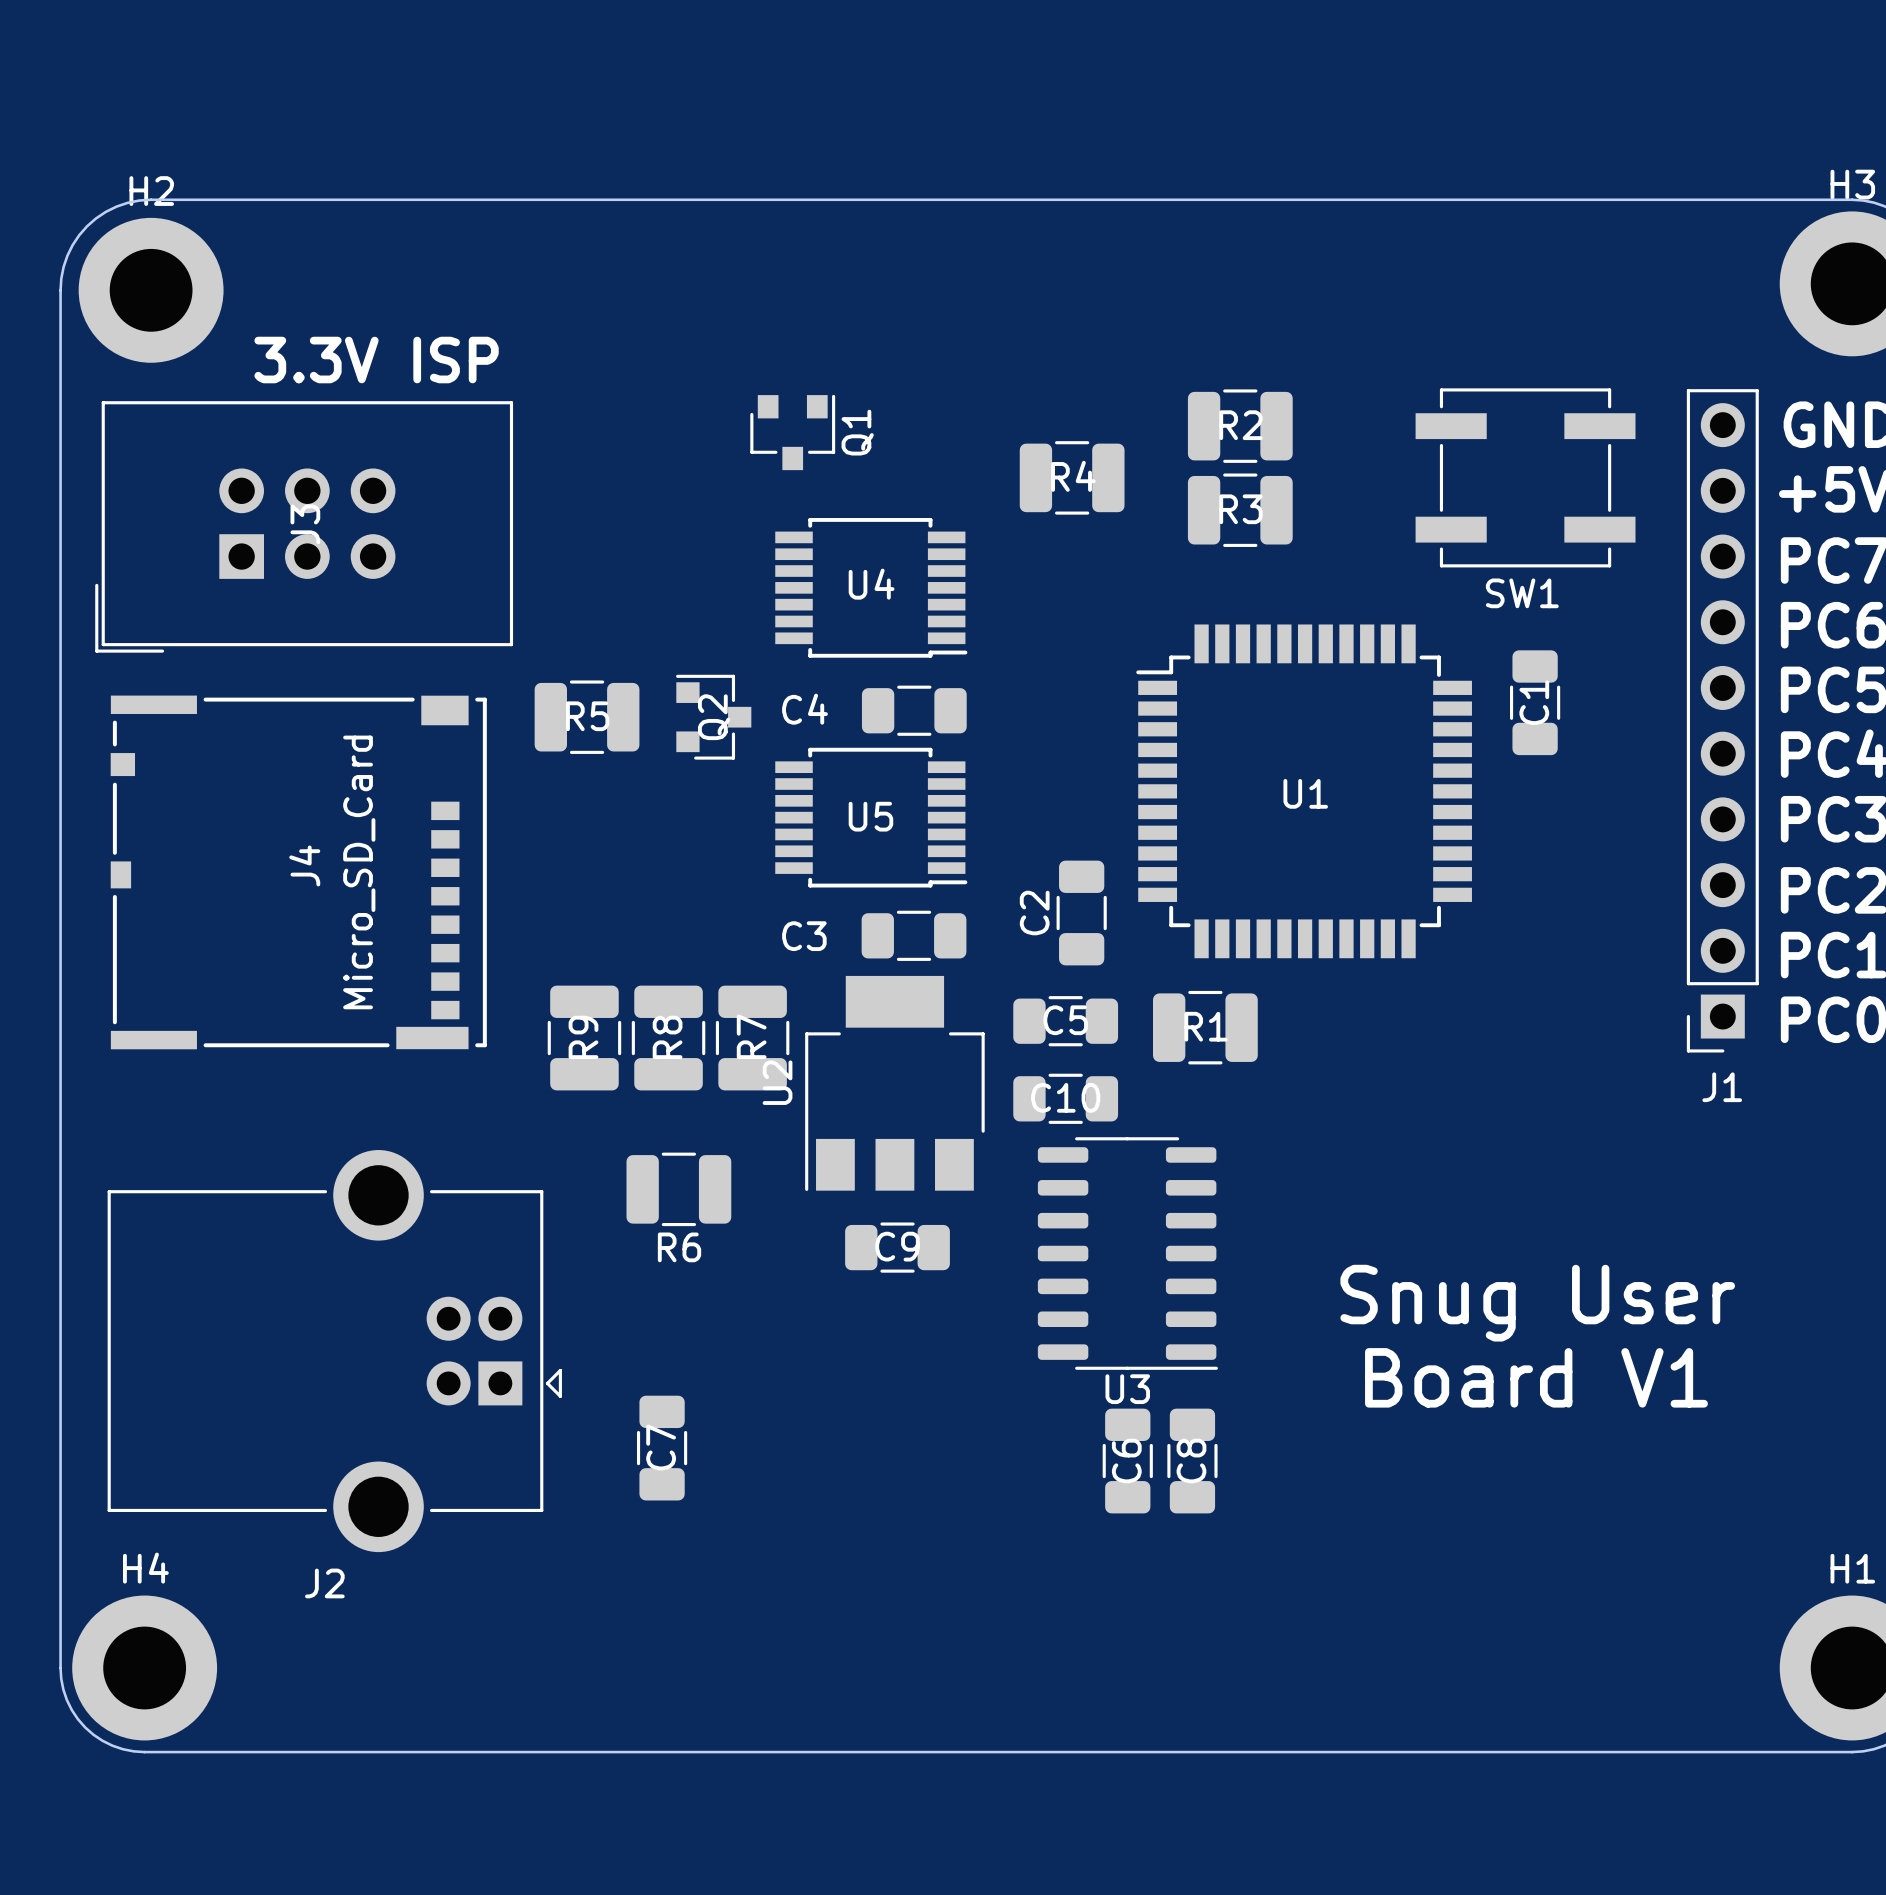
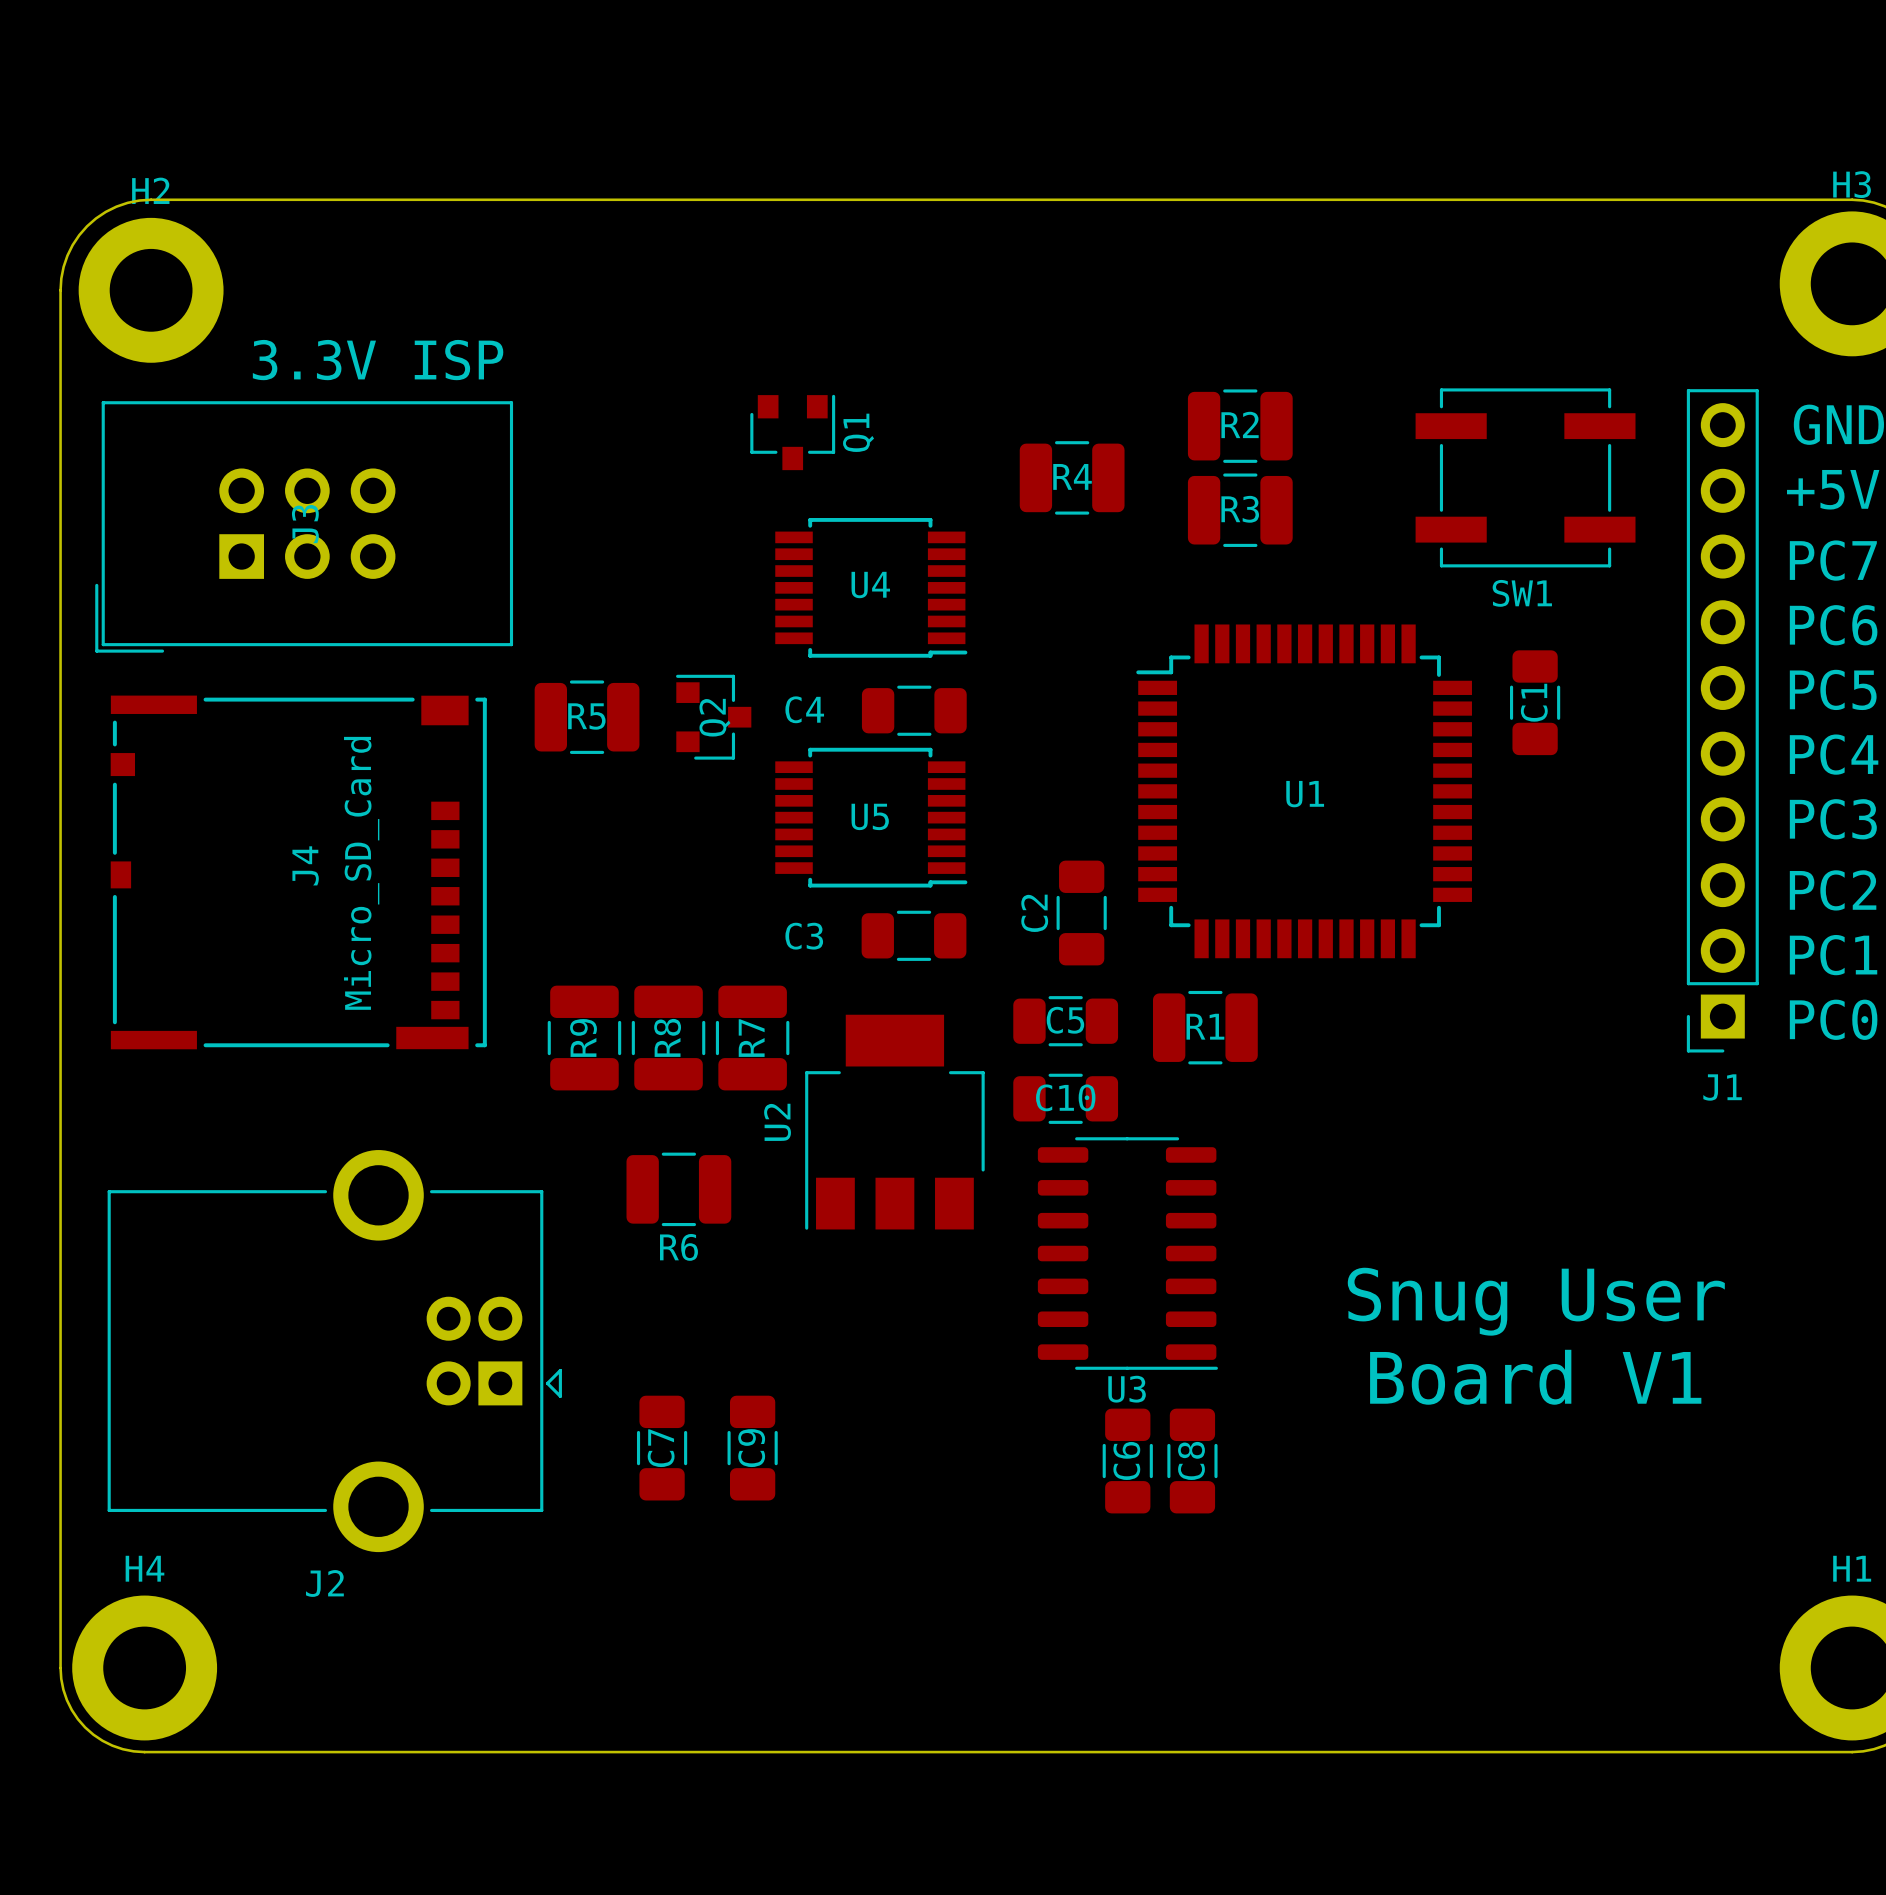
U2 position: (894, 1083) -> (894, 1122)
C9 rotation: 0° (897, 1247) -> 90° clockwise (752, 1448)
C9 position: (897, 1247) -> (752, 1448)

